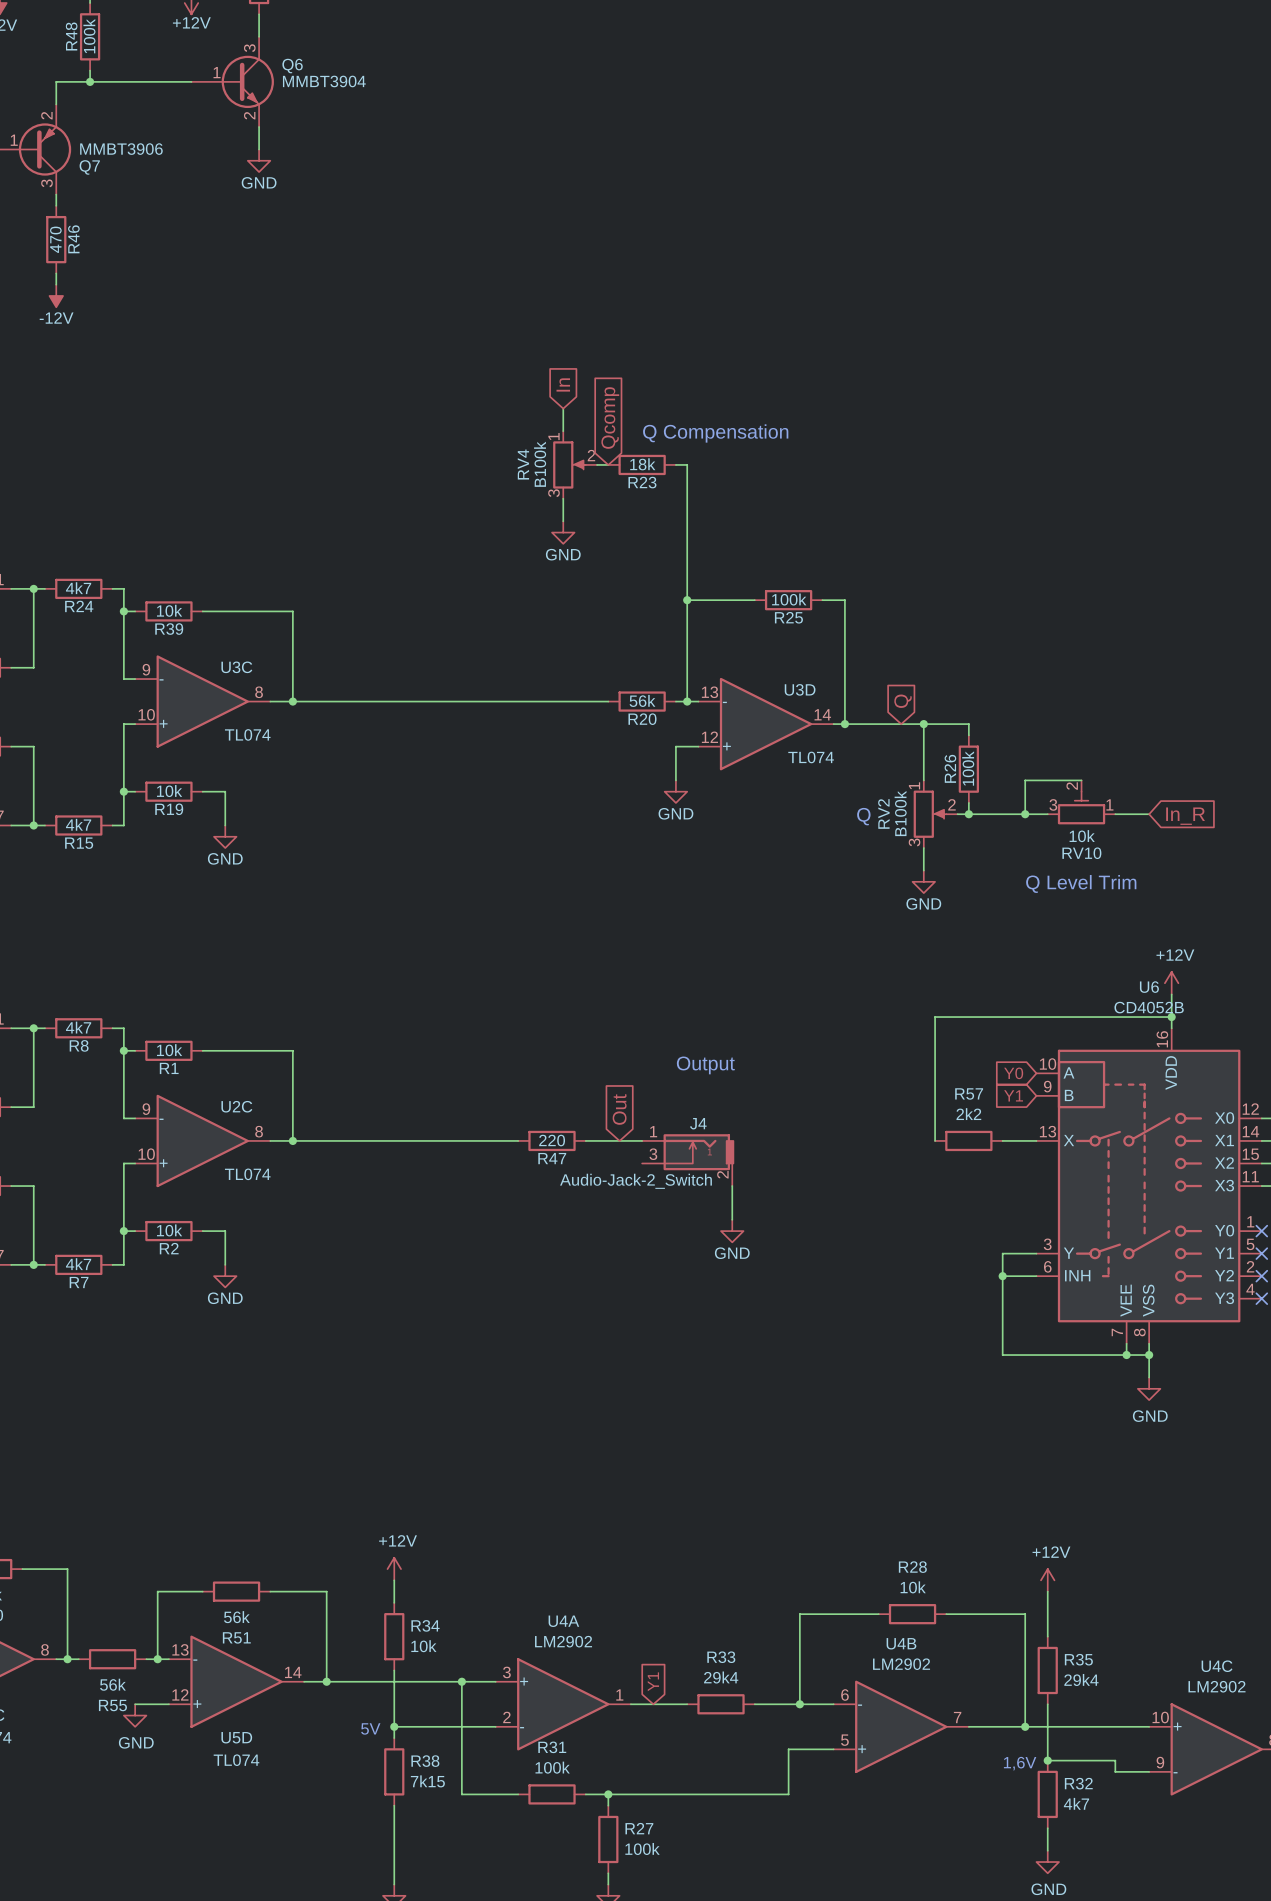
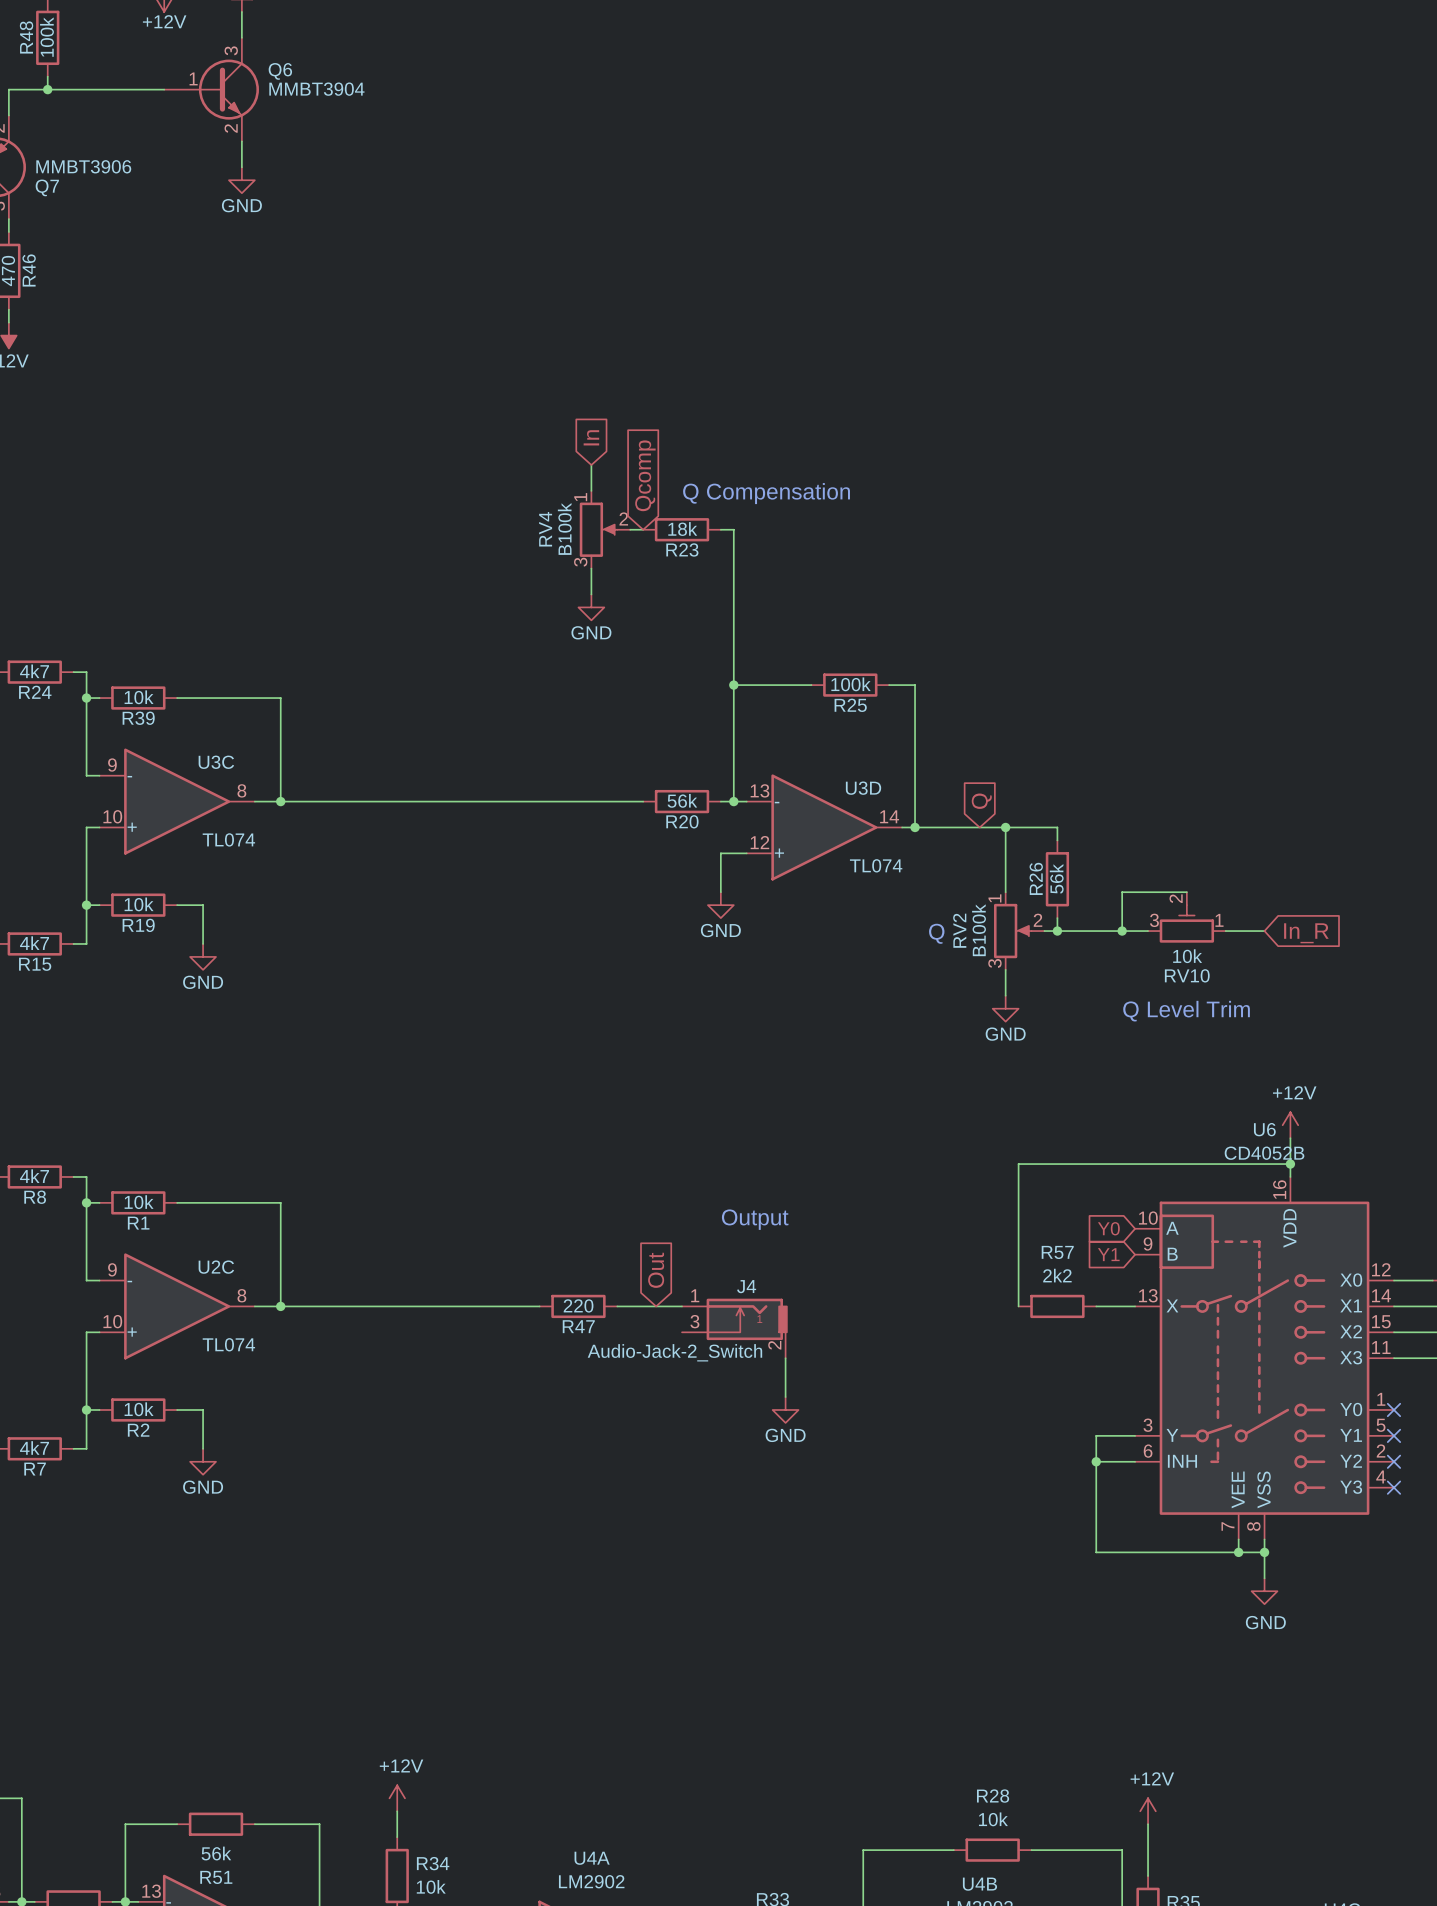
R26 value: 100k (968, 768) -> 56k (1056, 878)

